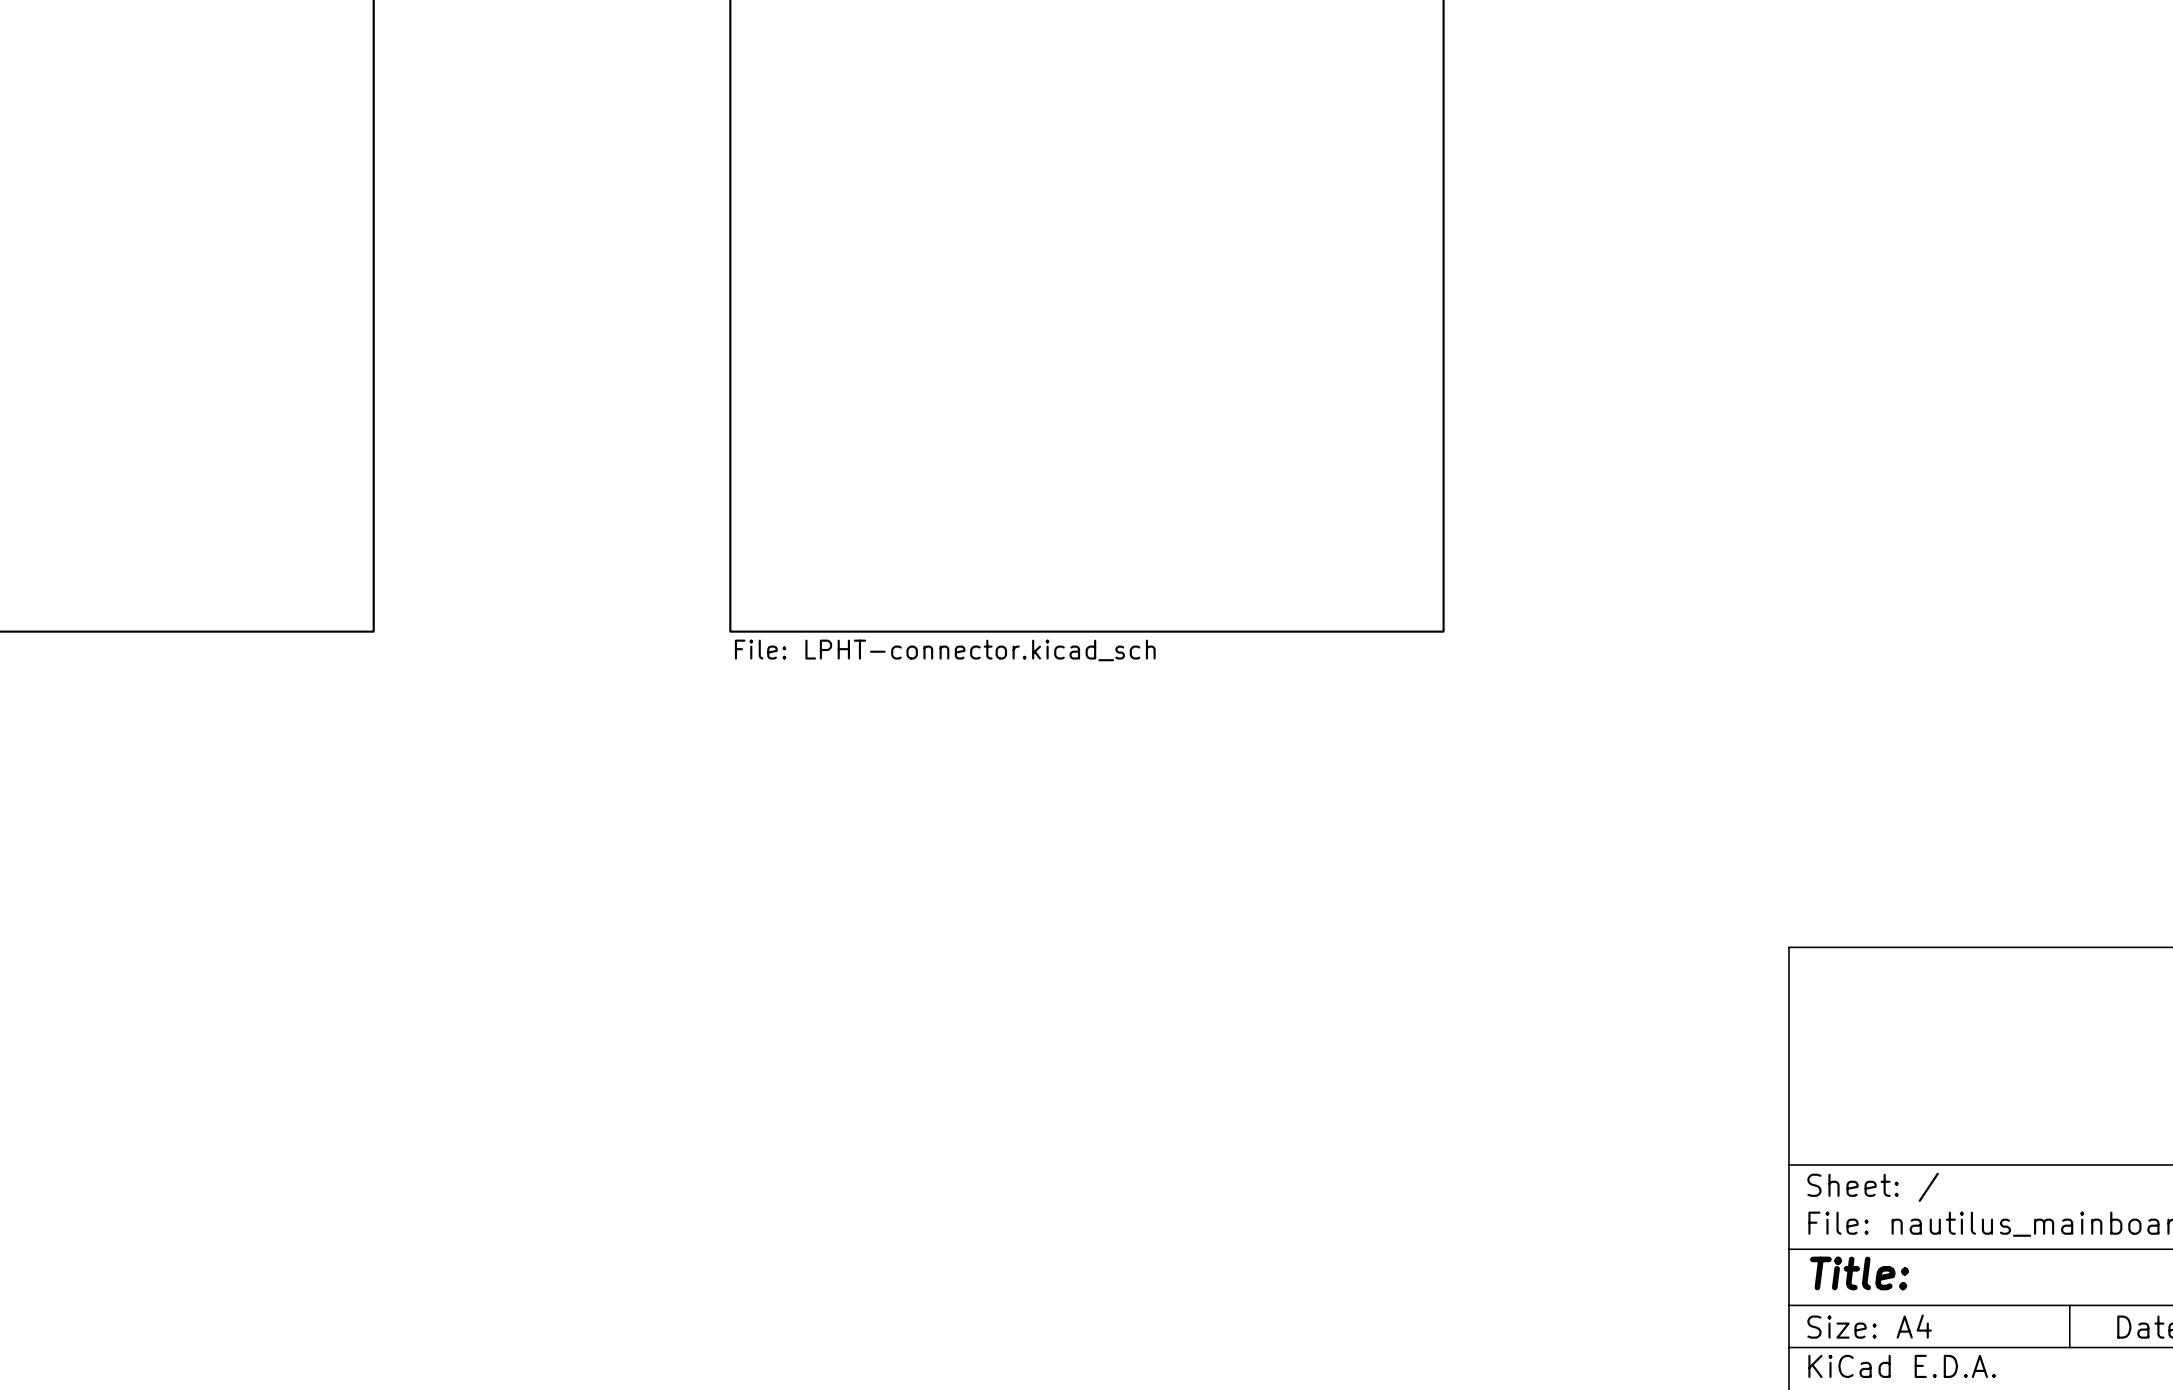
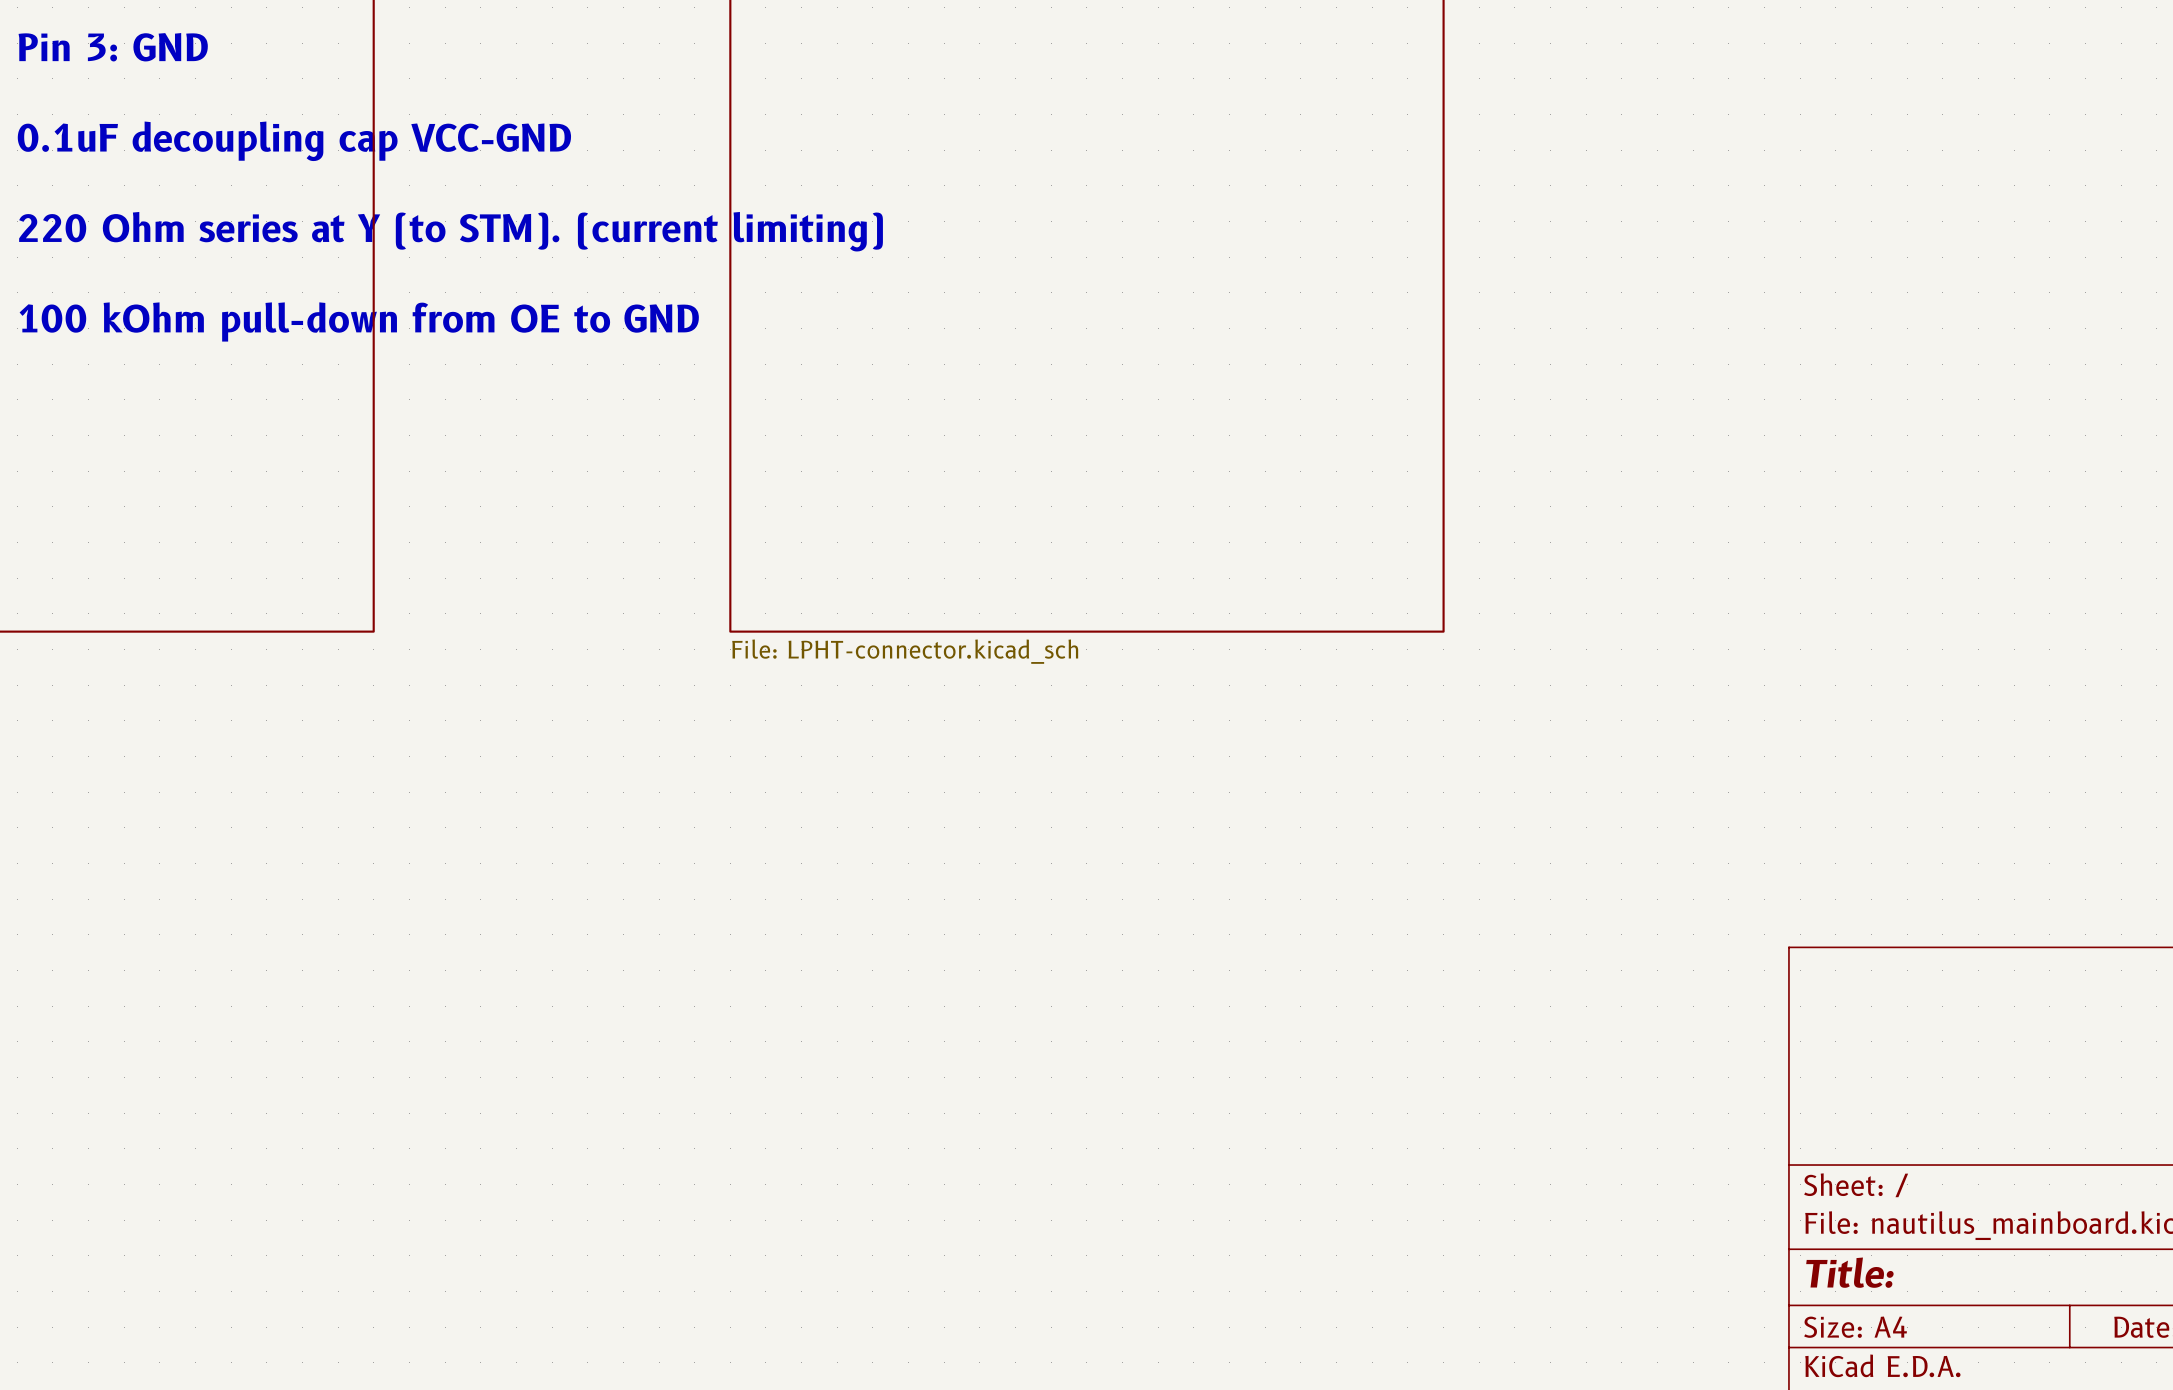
text: none -> Pin 3: GND (113, 47)
text: none -> 0.1uF decoupling cap VCC-GND (294, 141)
text: none -> 220 Ohm series at Y (to STM). (current limiting) (451, 231)
text: none -> 100 kOhm pull-down from OE to GND (359, 321)

